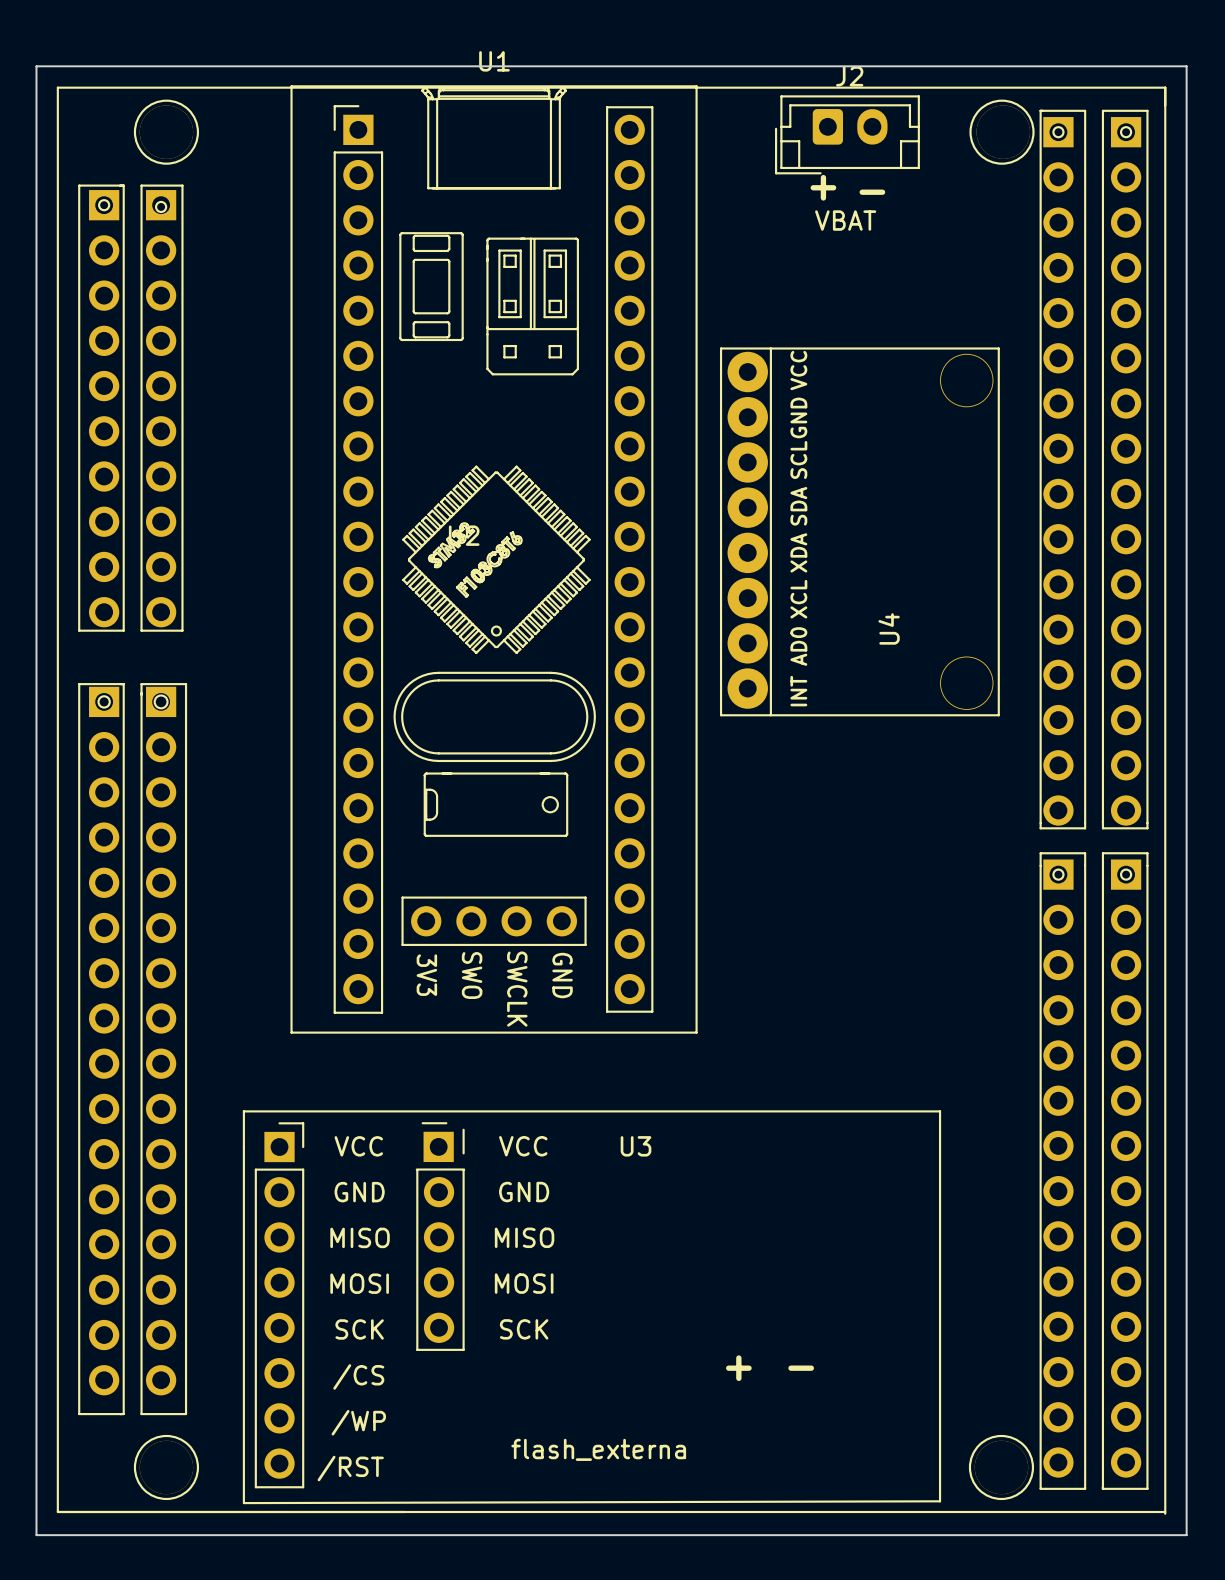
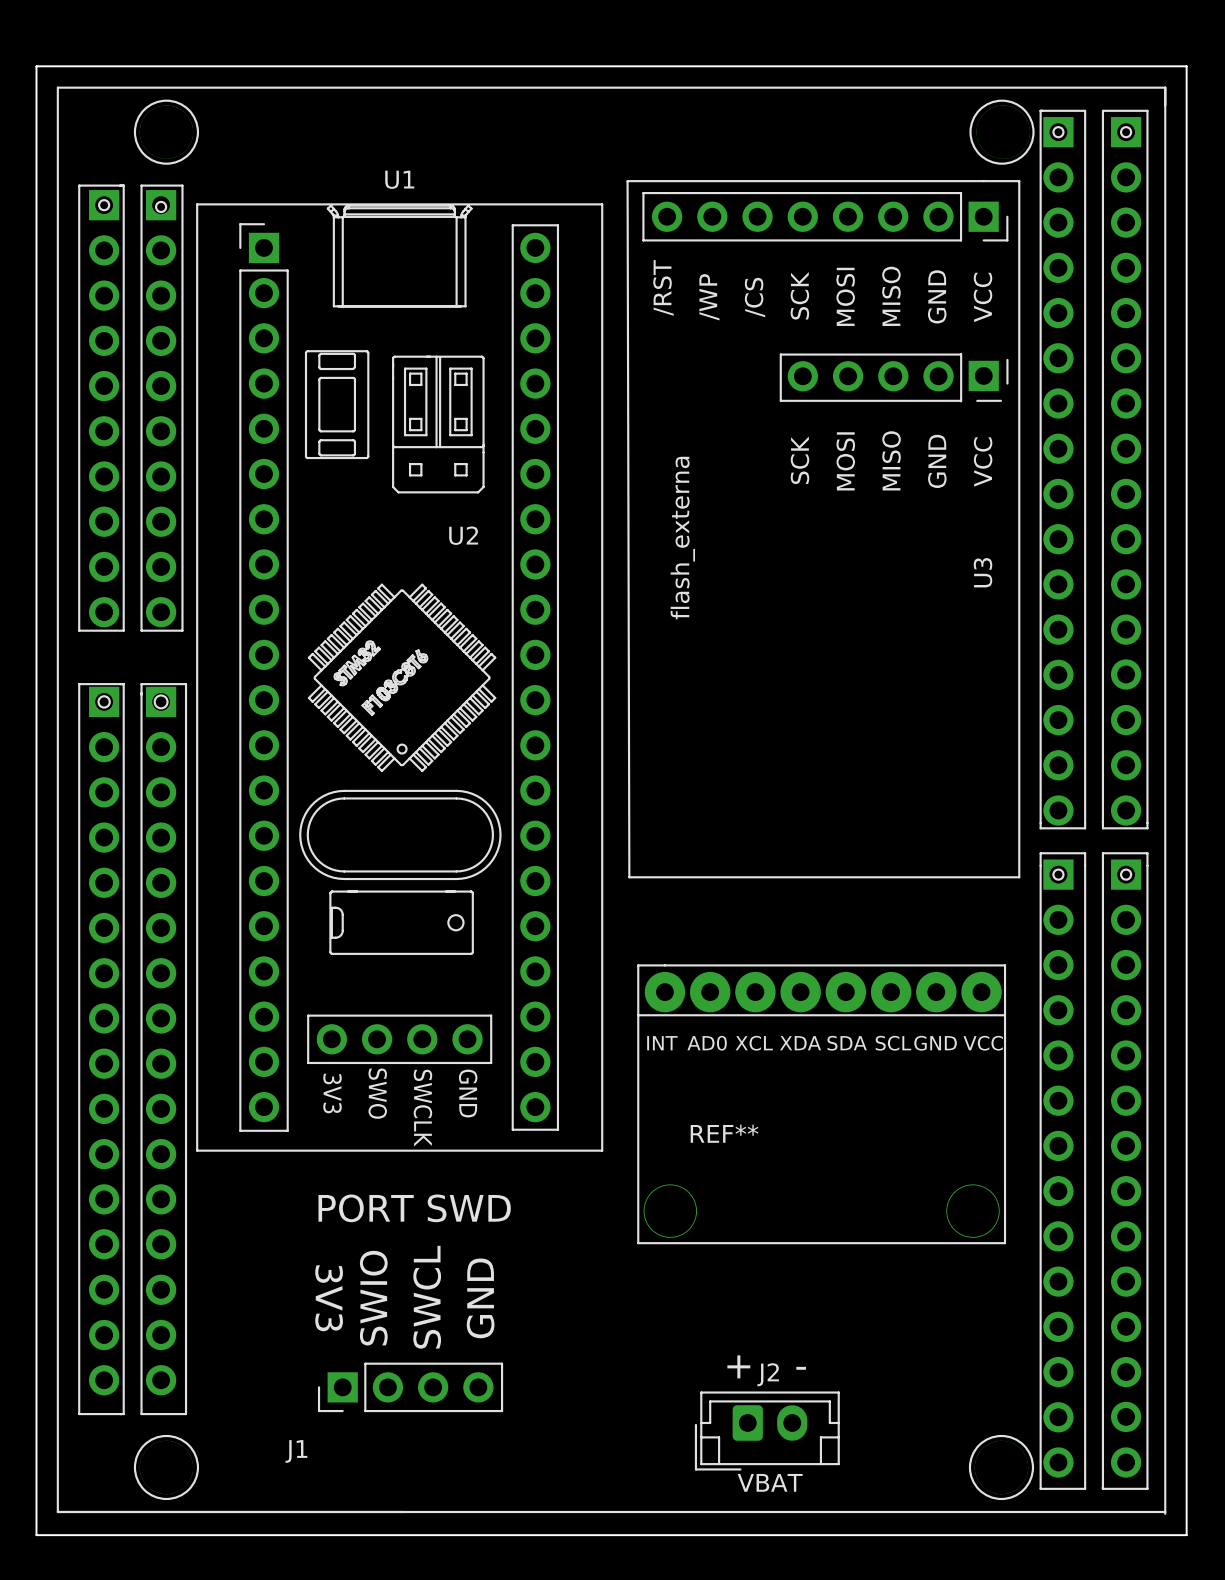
J2 position: (847, 134) -> (767, 1430)
text: + (823, 187) -> none
text: - (872, 192) -> none
J2 value position: VBAT (845, 220) -> VBAT (770, 1482)
U4: (859, 531) -> none
U1 position: (494, 559) -> (399, 677)
REF**: none -> (821, 1104)
text: none -> 3V3 (329, 1298)
text: none -> SWCL (427, 1297)
text: none -> SWIO (373, 1298)
text: none -> GND (480, 1298)
U3 rotation: 0° (591, 1307) -> 90° clockwise (823, 529)
U3 position: (591, 1307) -> (823, 529)
J1: none -> PORT SWD (410, 1387)

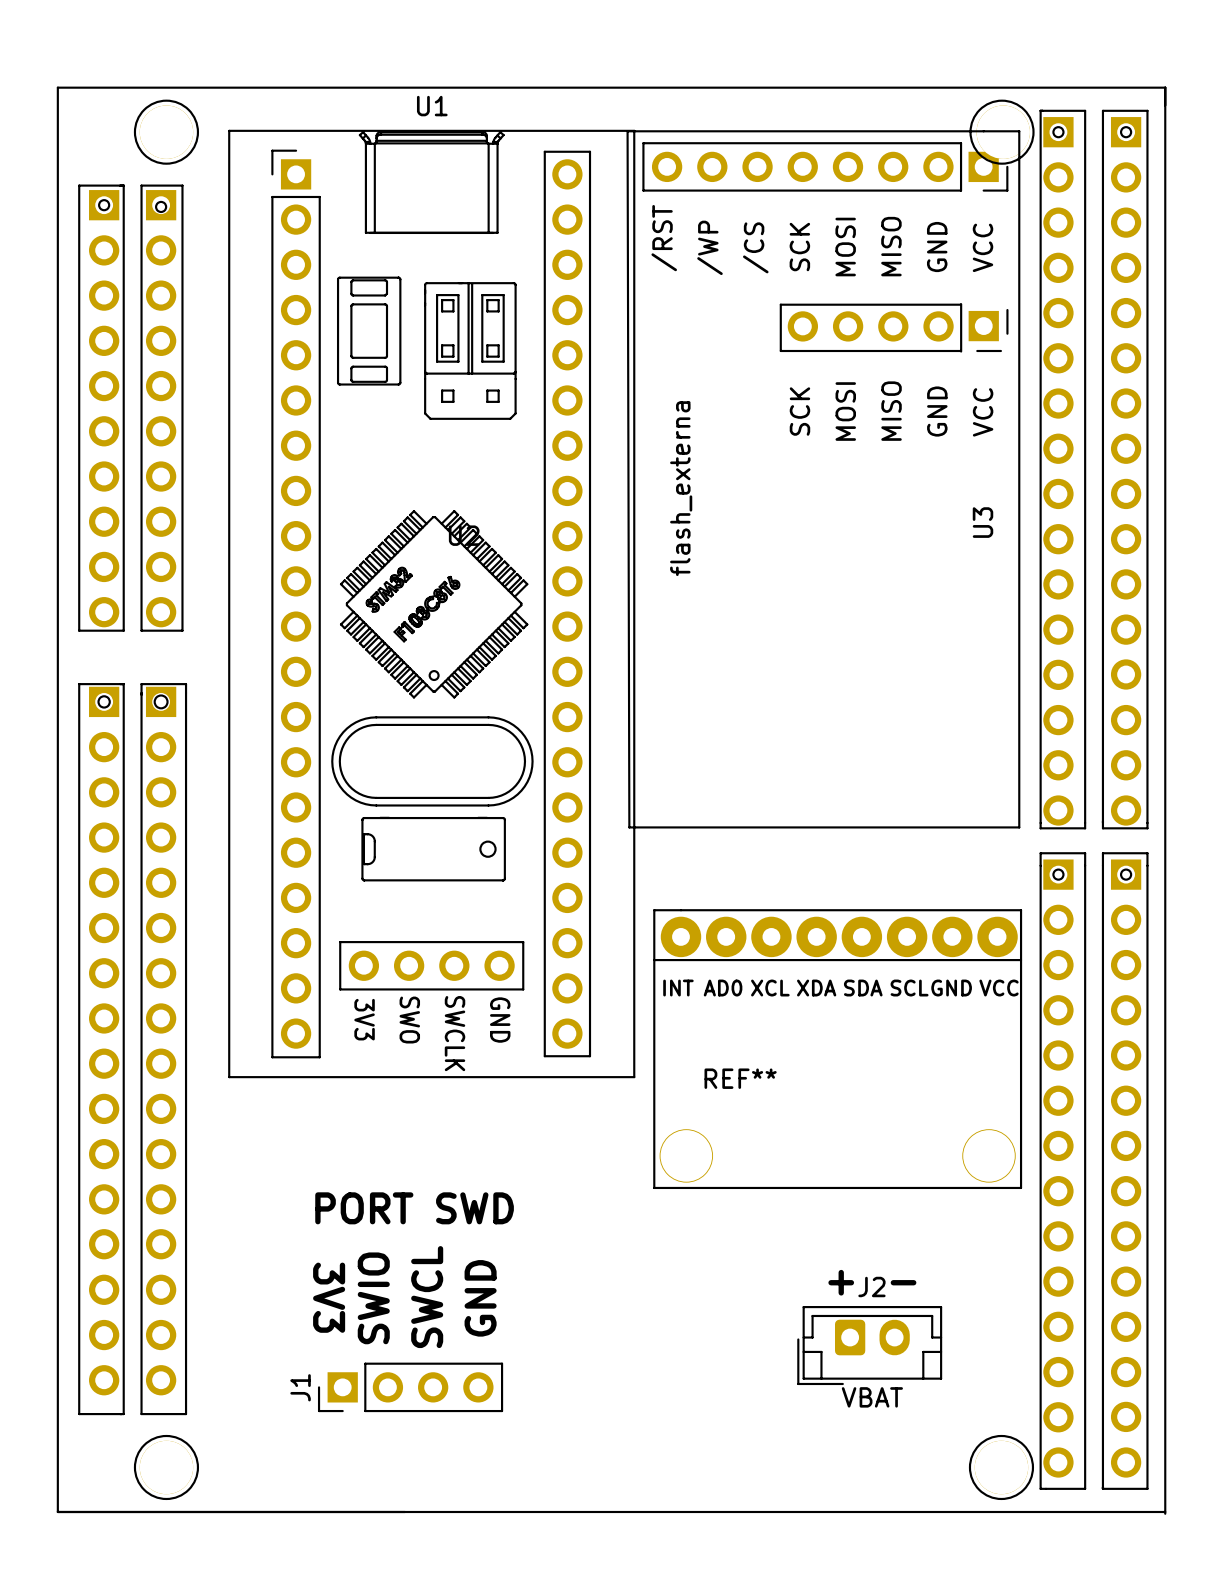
board edge: (36, 66) (1186, 66) (1186, 1535) (36, 1535) (36, 66) -> none
U3 position: (823, 529) -> (823, 479)
U1 position: (399, 677) -> (431, 603)
REF** position: (821, 1104) -> (837, 1049)
text position: + (738, 1366) -> + (841, 1282)
text position: - (801, 1368) -> - (903, 1282)
J2 position: (767, 1430) -> (869, 1345)
J1 name rotation: 0° (296, 1451) -> 90° counterclockwise (300, 1387)
J1 name position: J1 (296, 1451) -> J1 (300, 1387)

